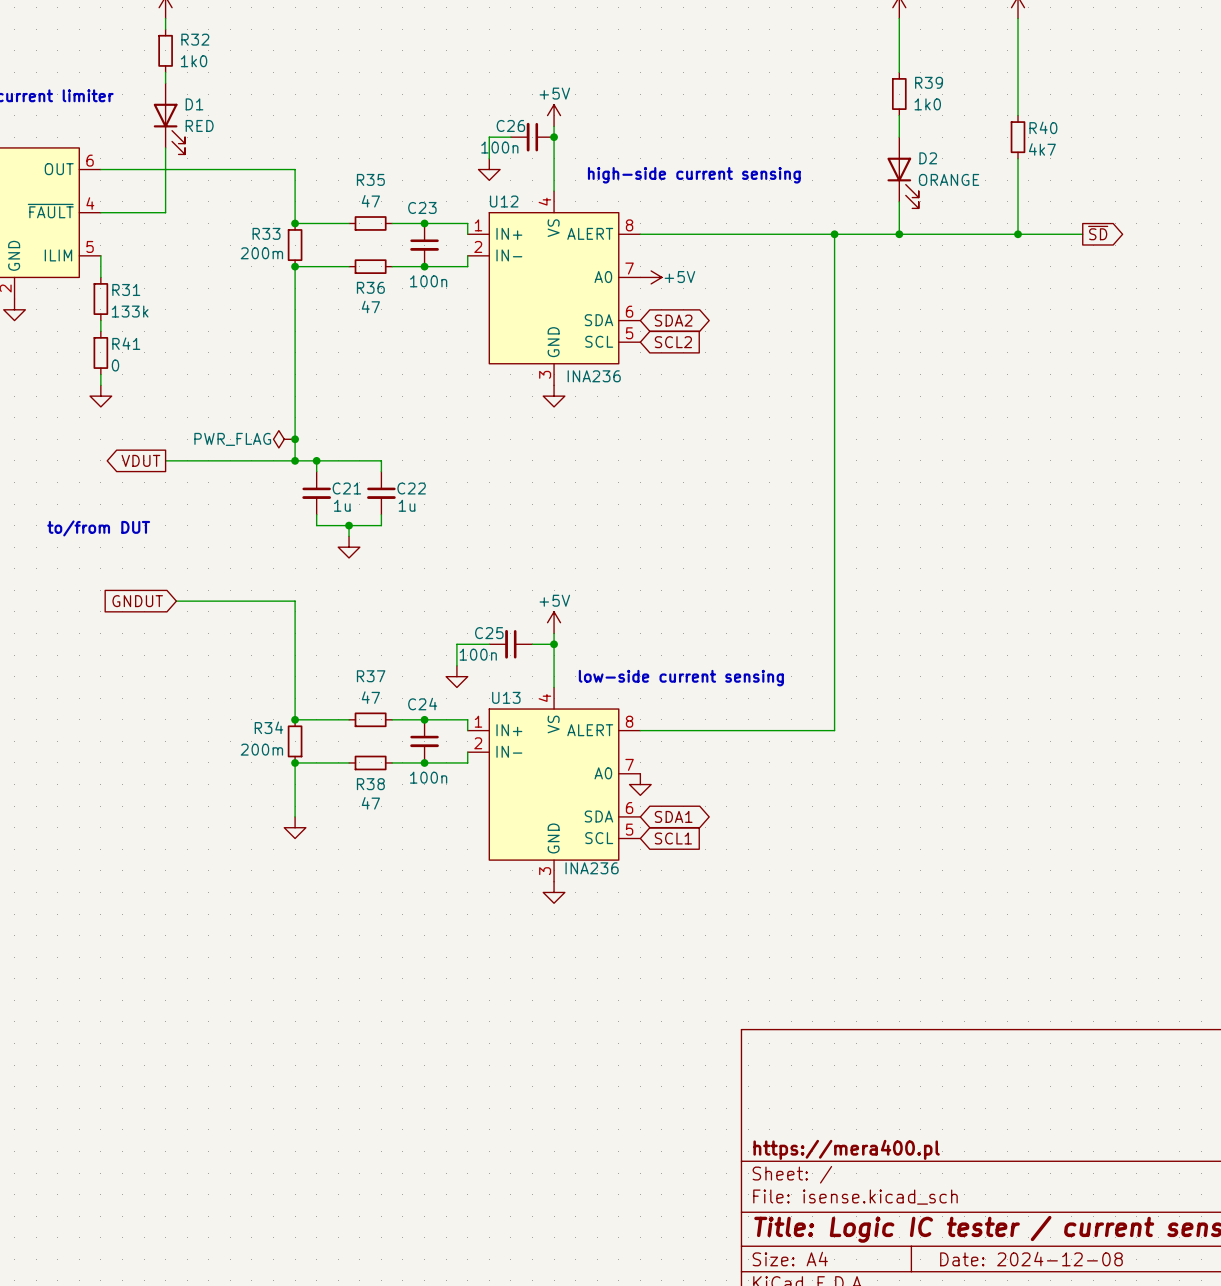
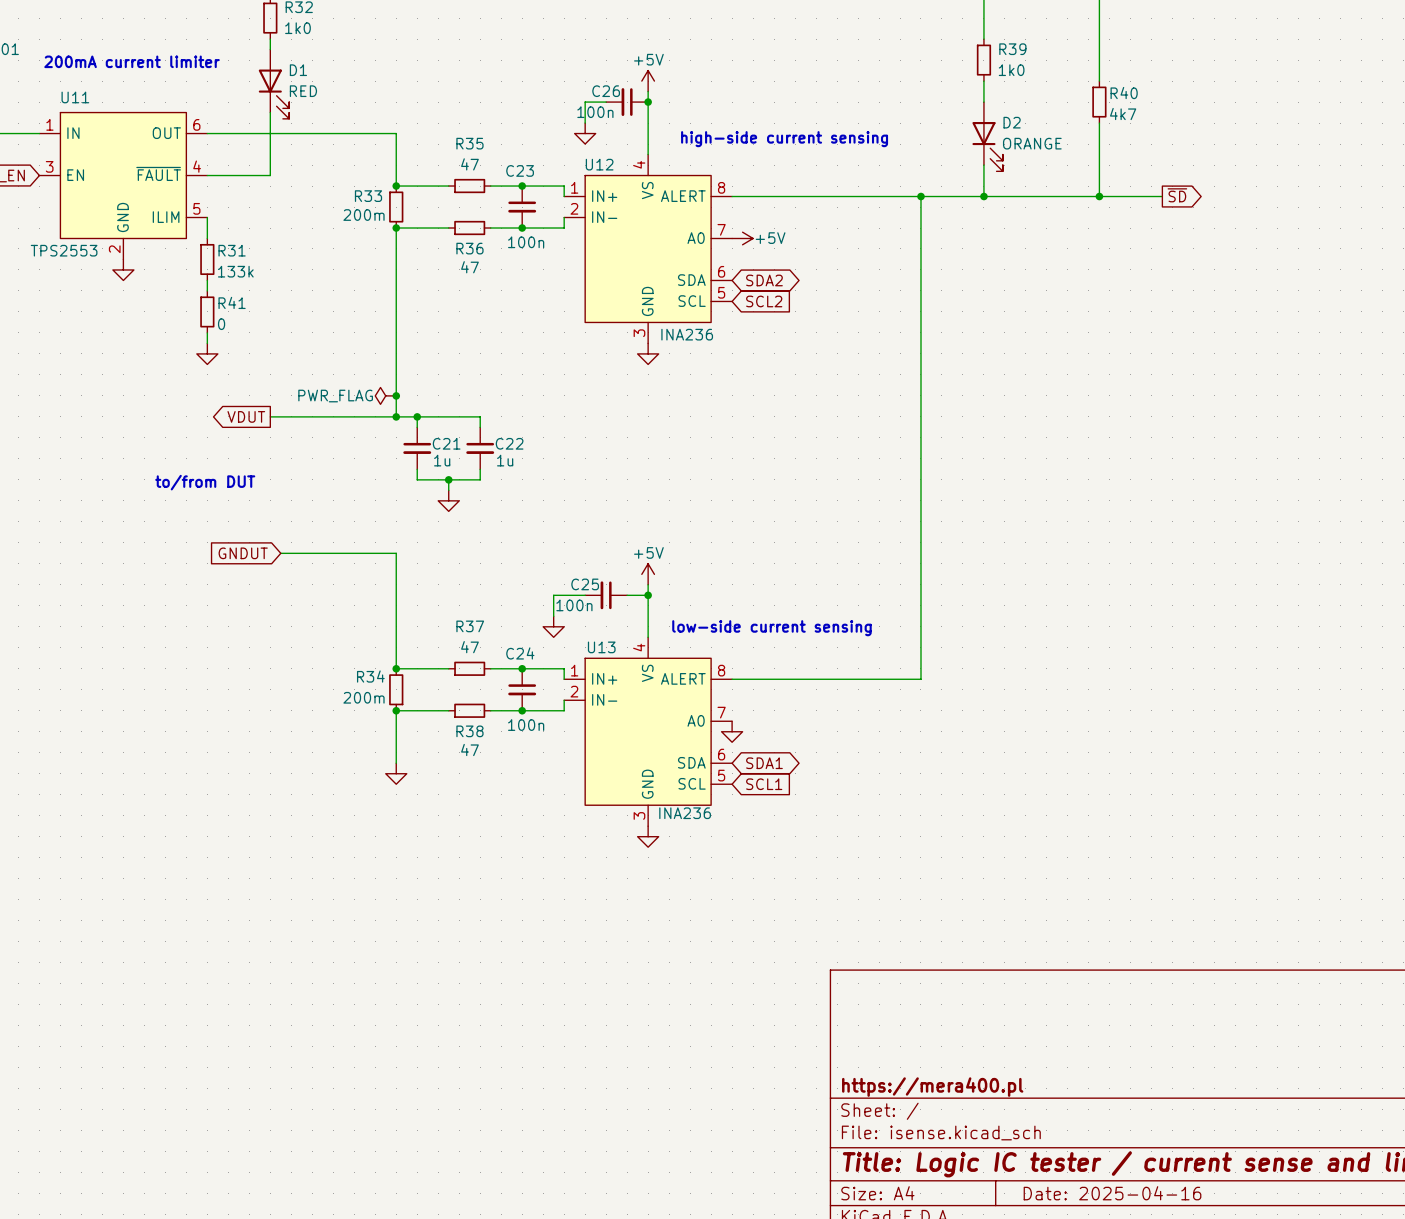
title block: Date: 2024-12-08 (1031, 1259) -> Date: 2025-04-16 (1112, 1193)

